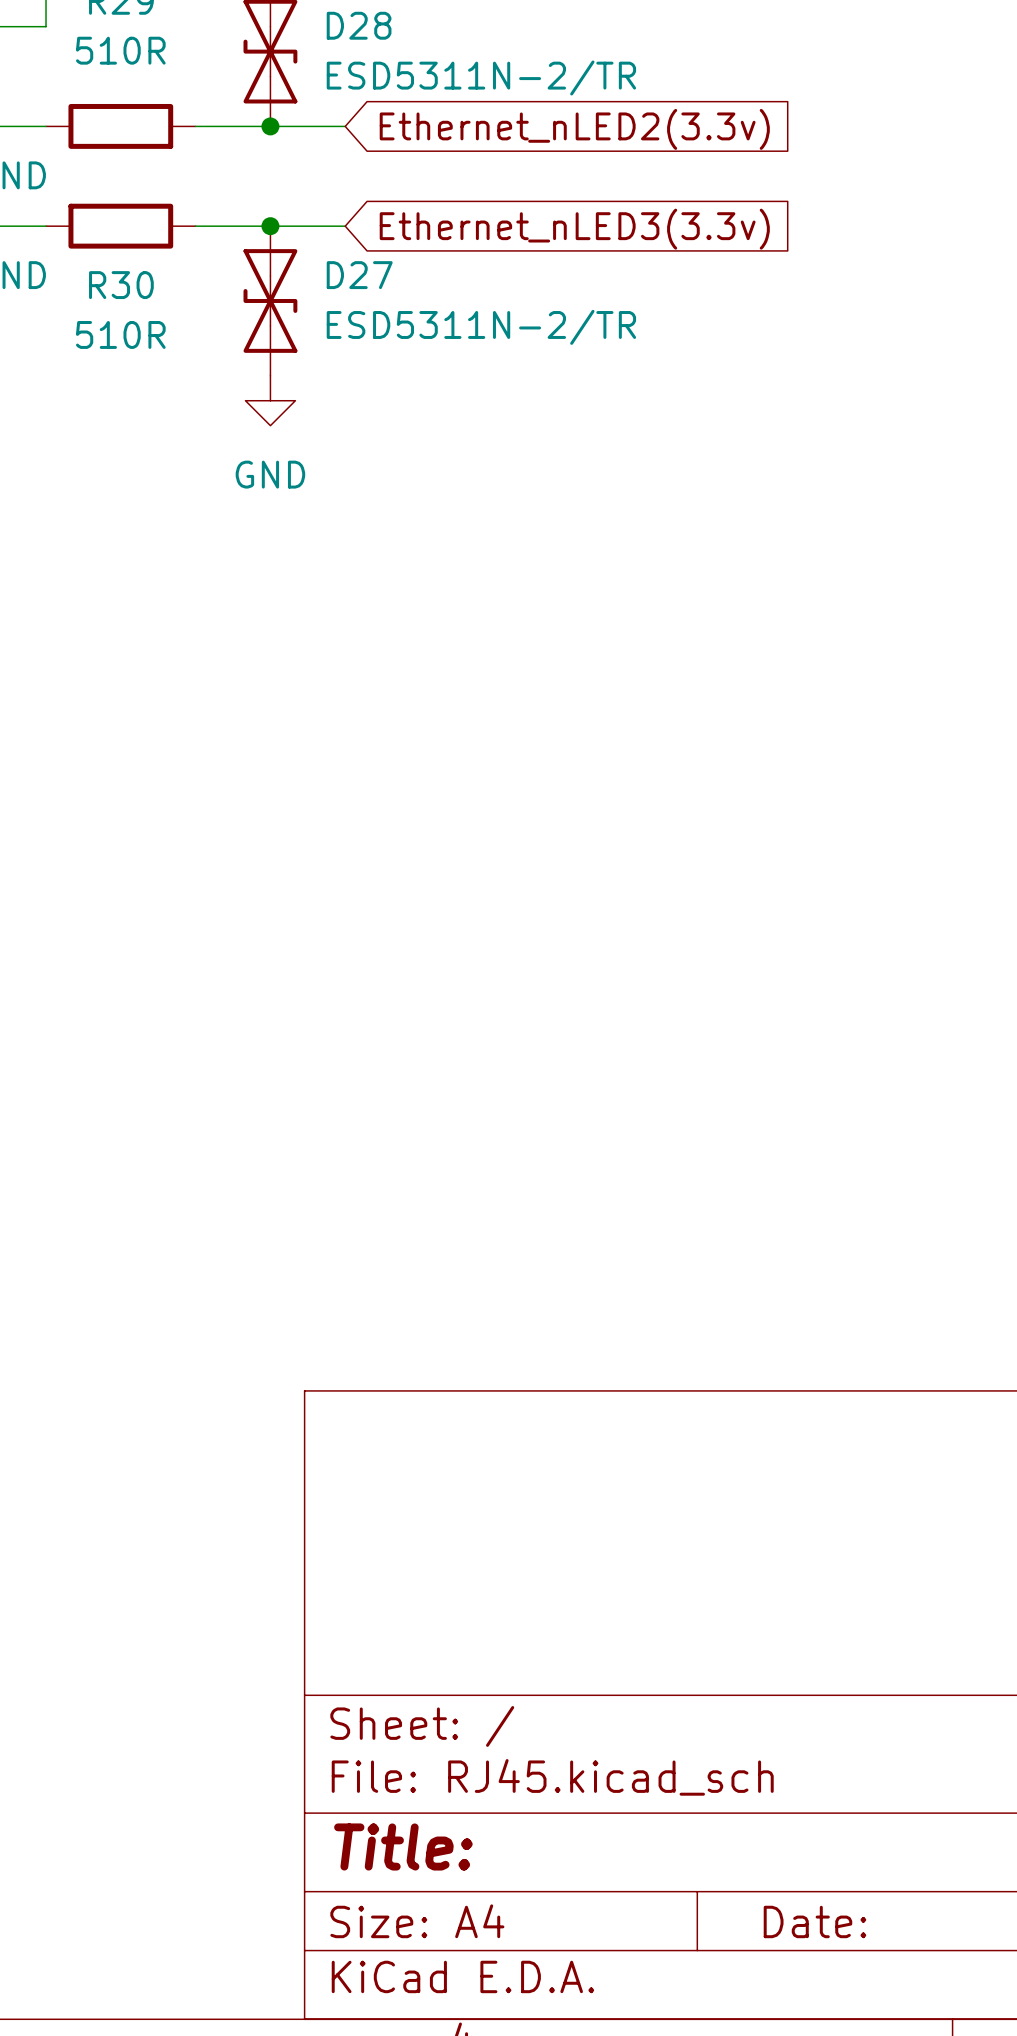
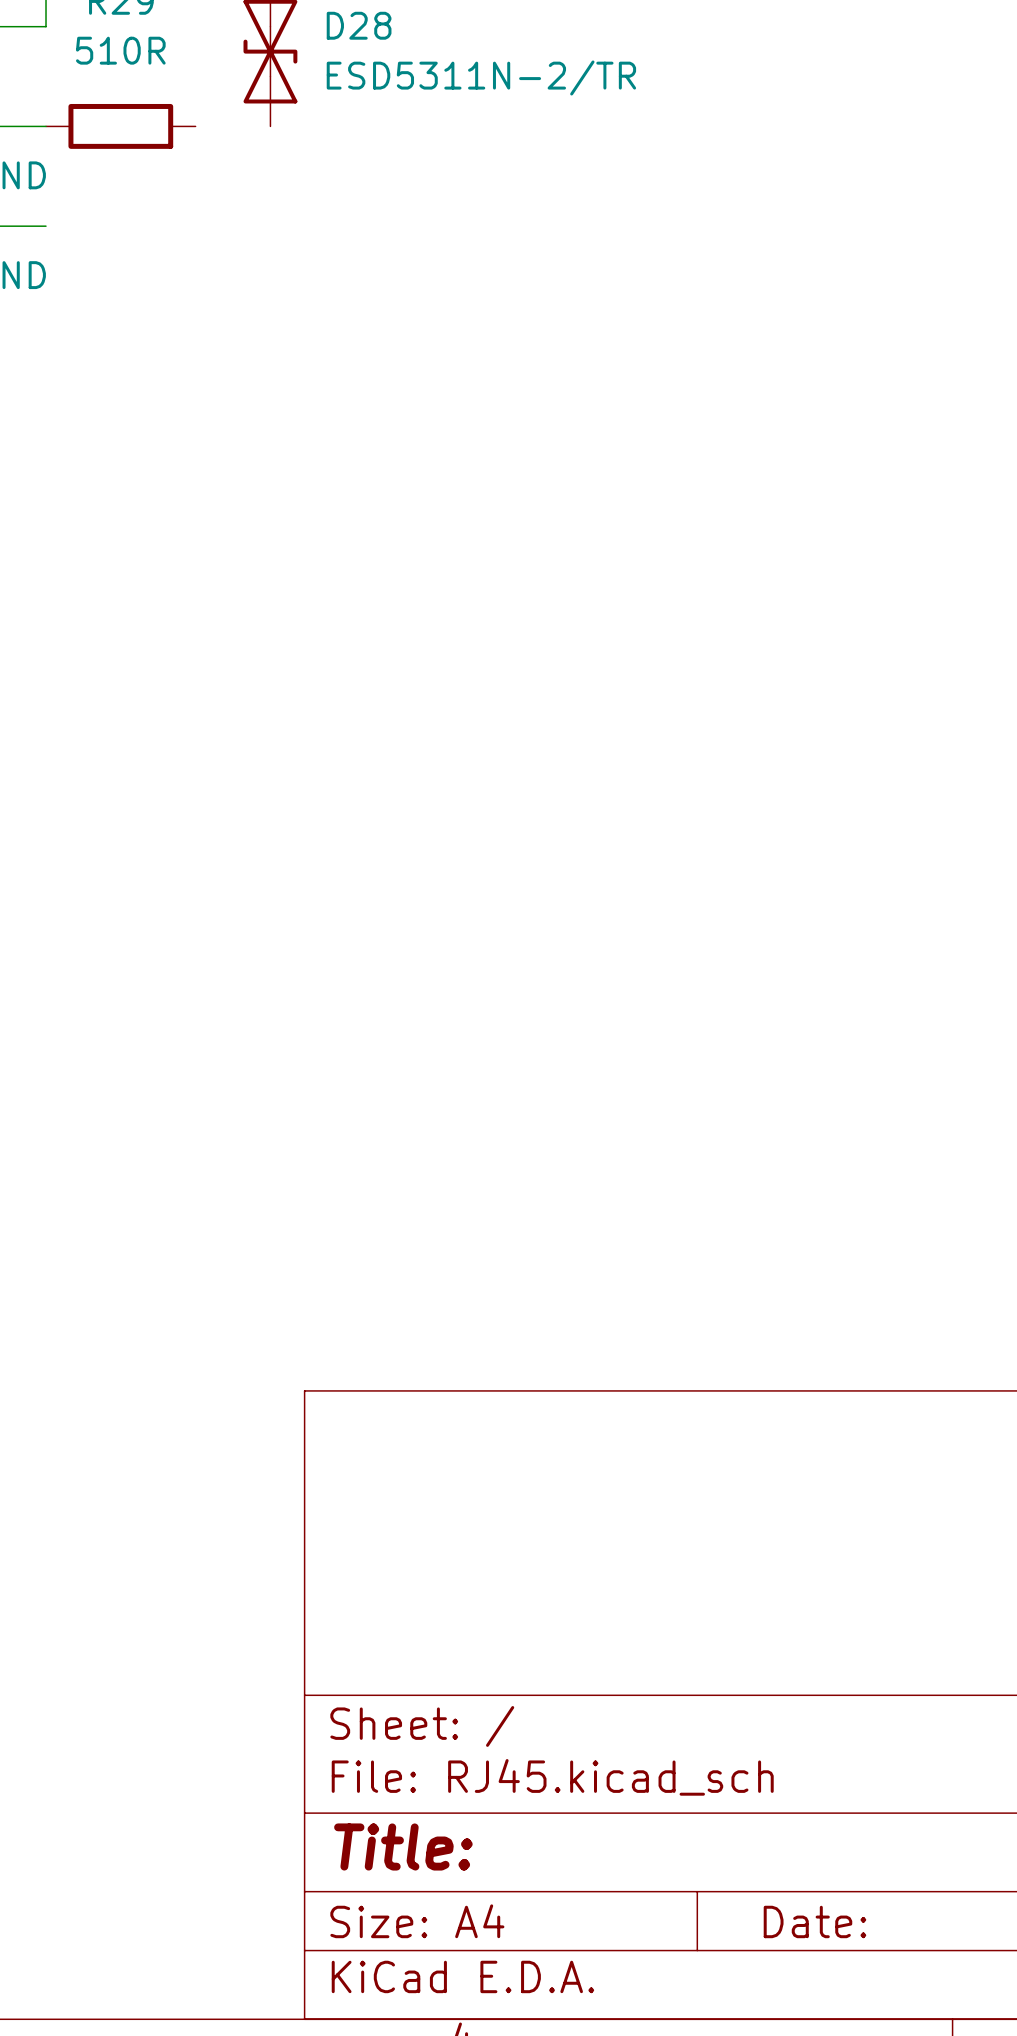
wire: (195, 126) (345, 126) -> none
junction: (270, 126) -> none
global label: Ethernet_nLED2(3.3v) (574, 129) -> none
R30: 510R (120, 226) -> none
wire: (195, 226) (345, 226) -> none
junction: (270, 226) -> none
global label: Ethernet_nLED3(3.3v) (574, 229) -> none
D27: ESD5311N-2/TR (270, 300) -> none
power symbol: GND (270, 400) -> none

